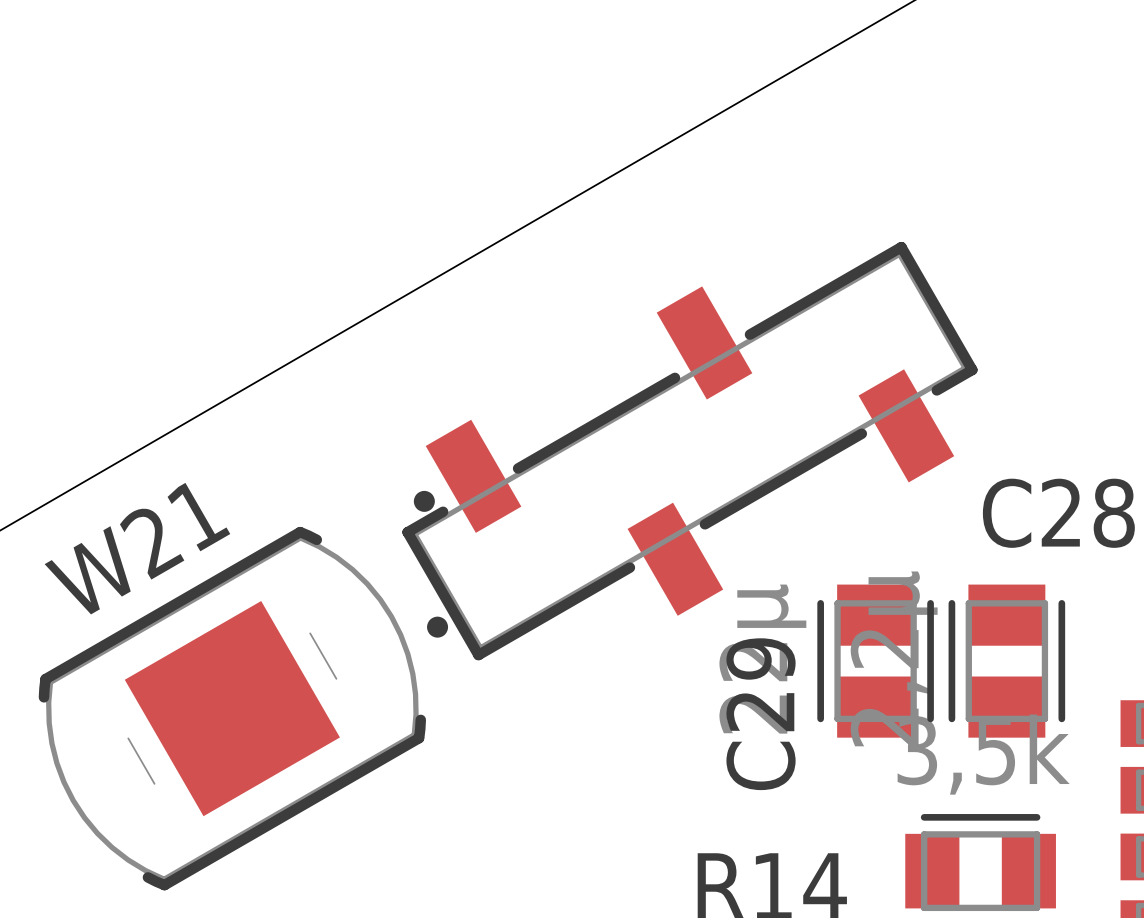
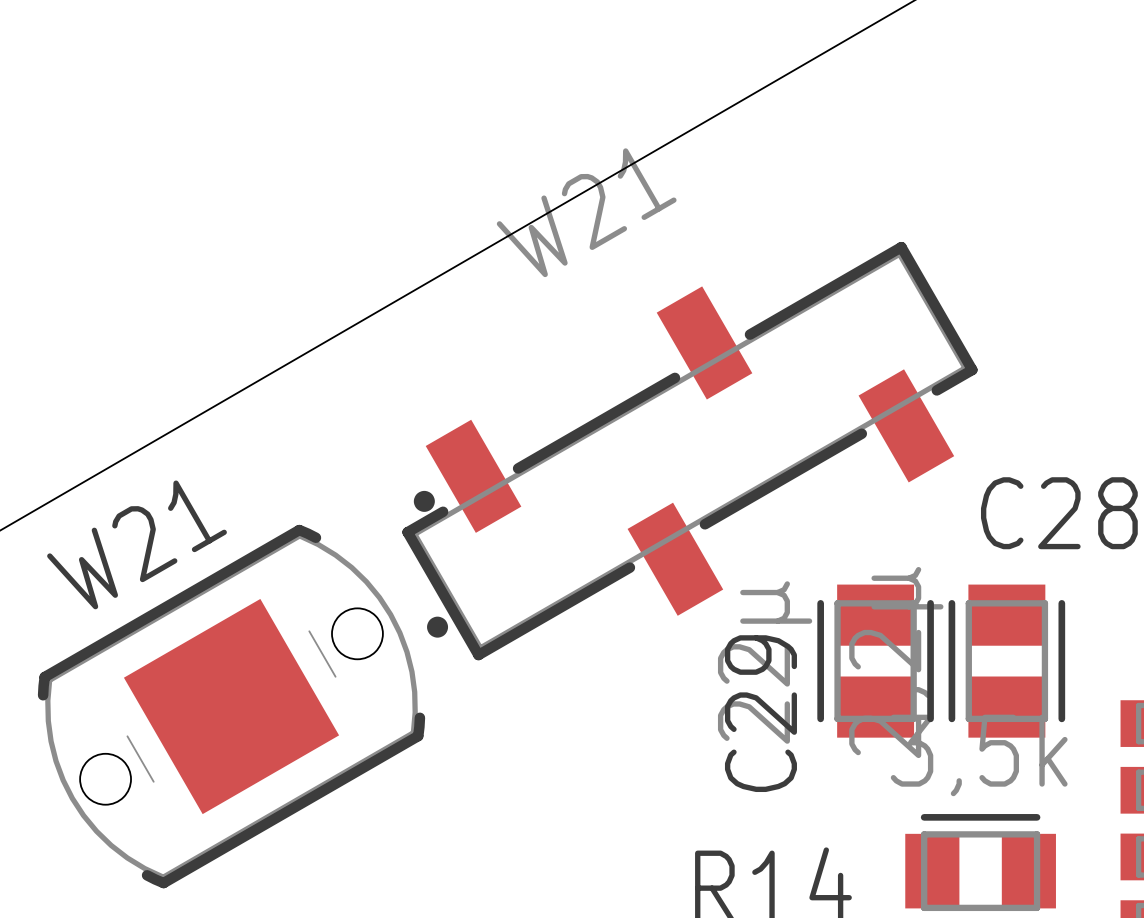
W21 value: none -> W21 (586, 212)
W21 footprint: [38, 241, 978, 891] -> [37, 241, 978, 889]

